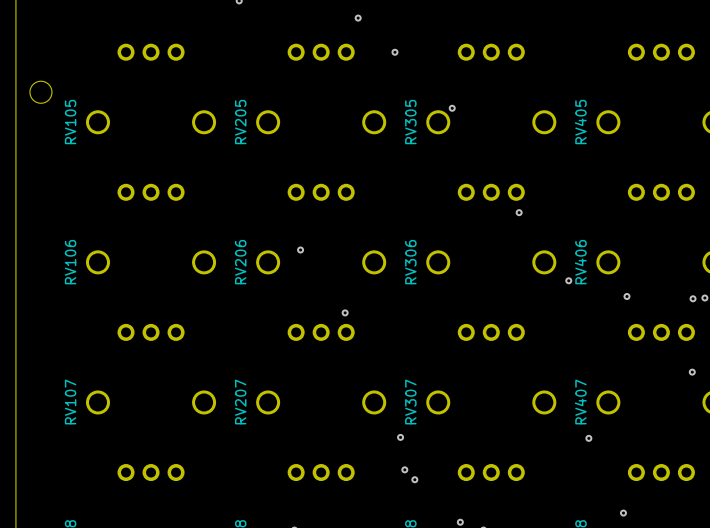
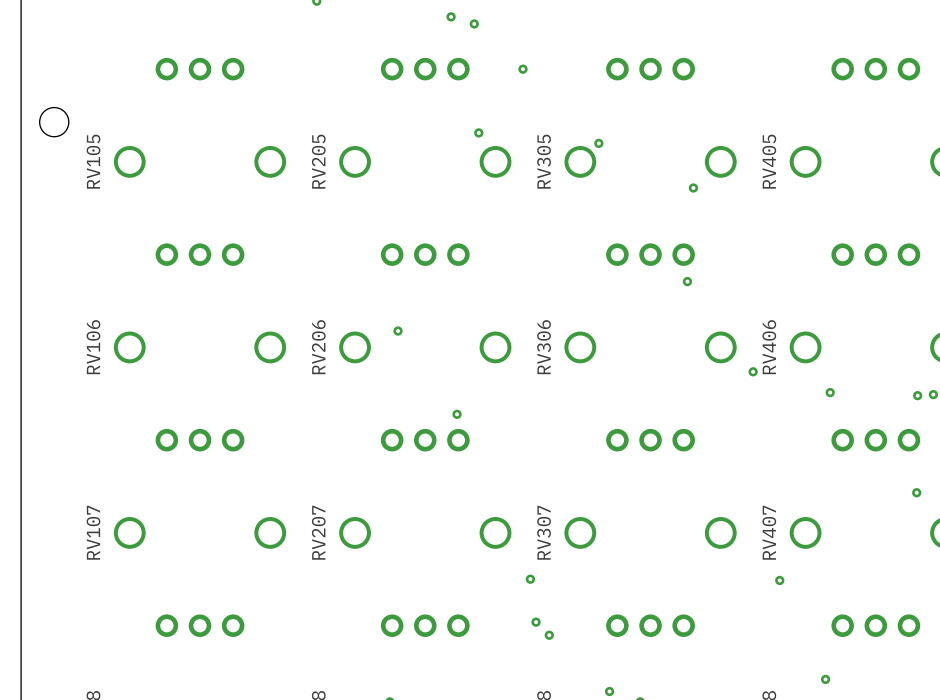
via: none -> (451, 16)
via: none -> (478, 132)
via: none -> (693, 187)

